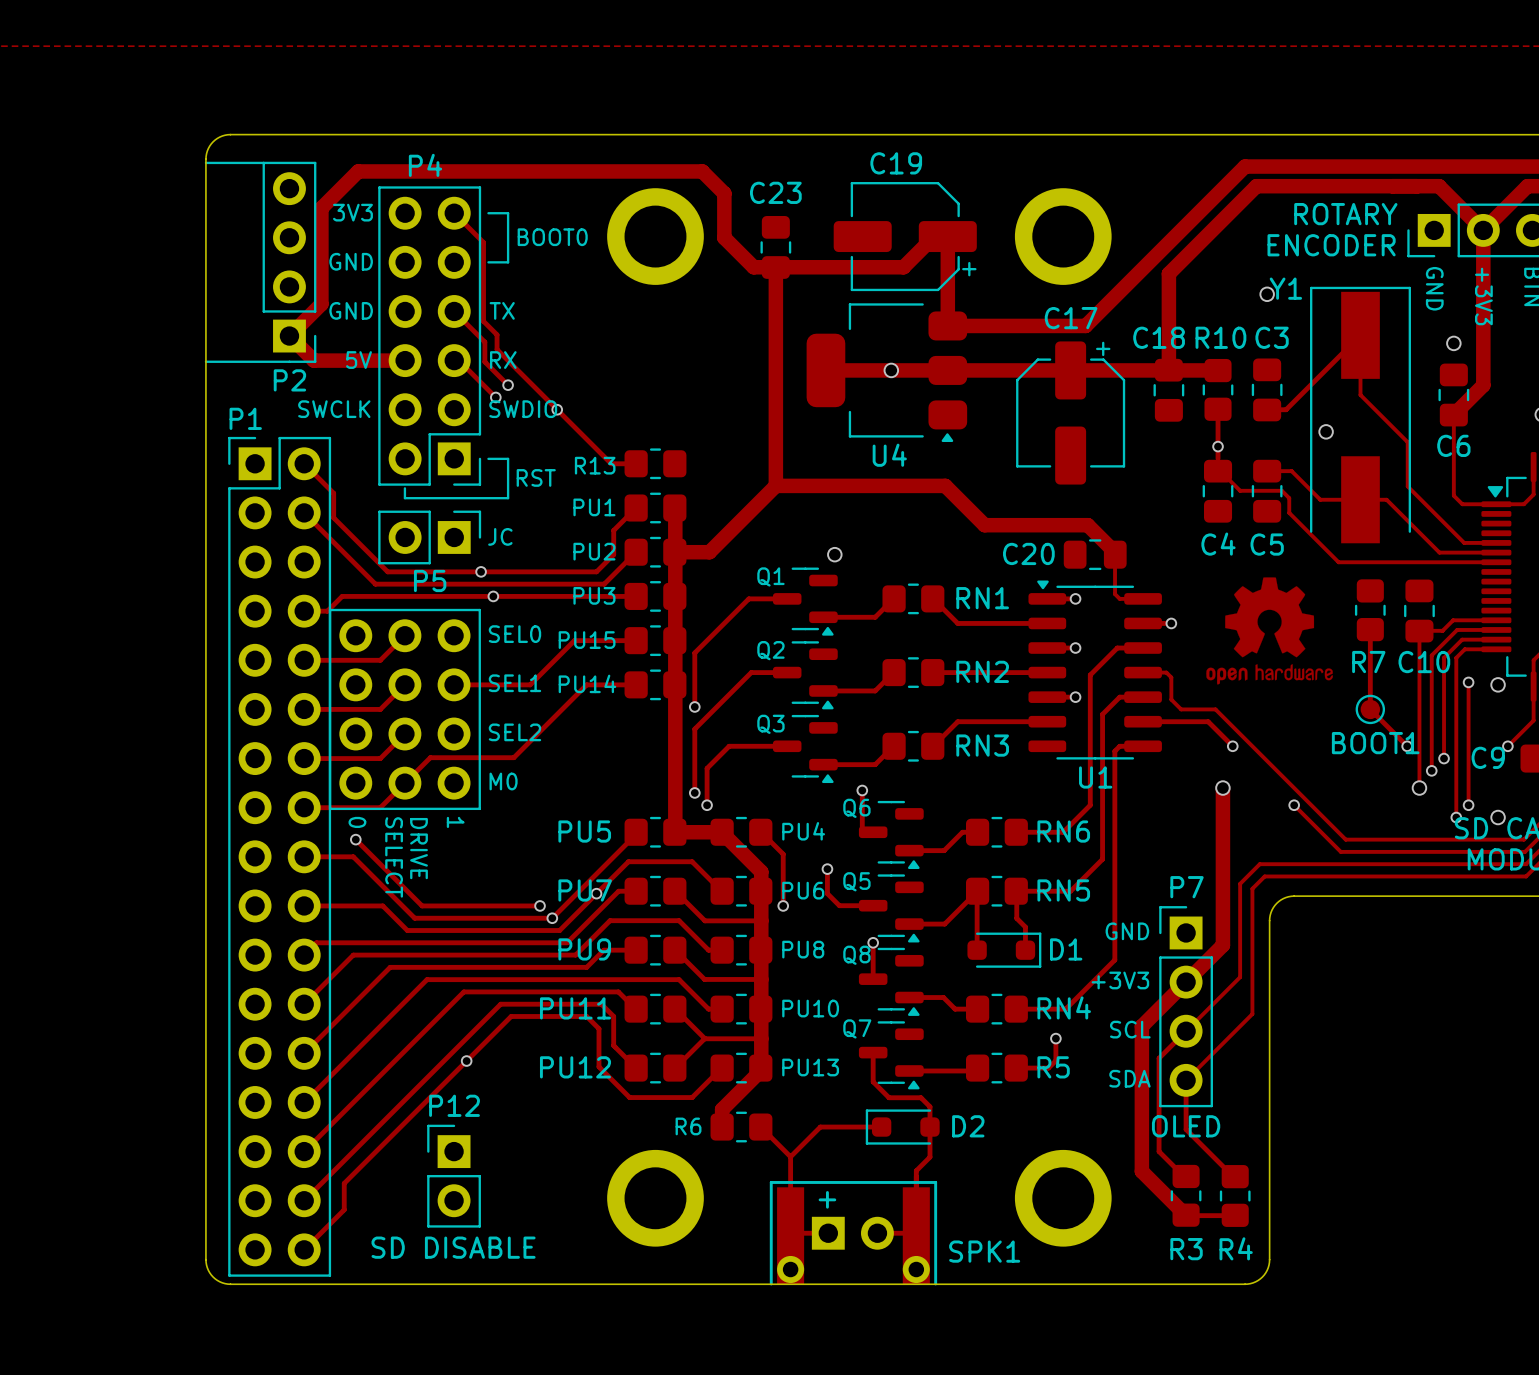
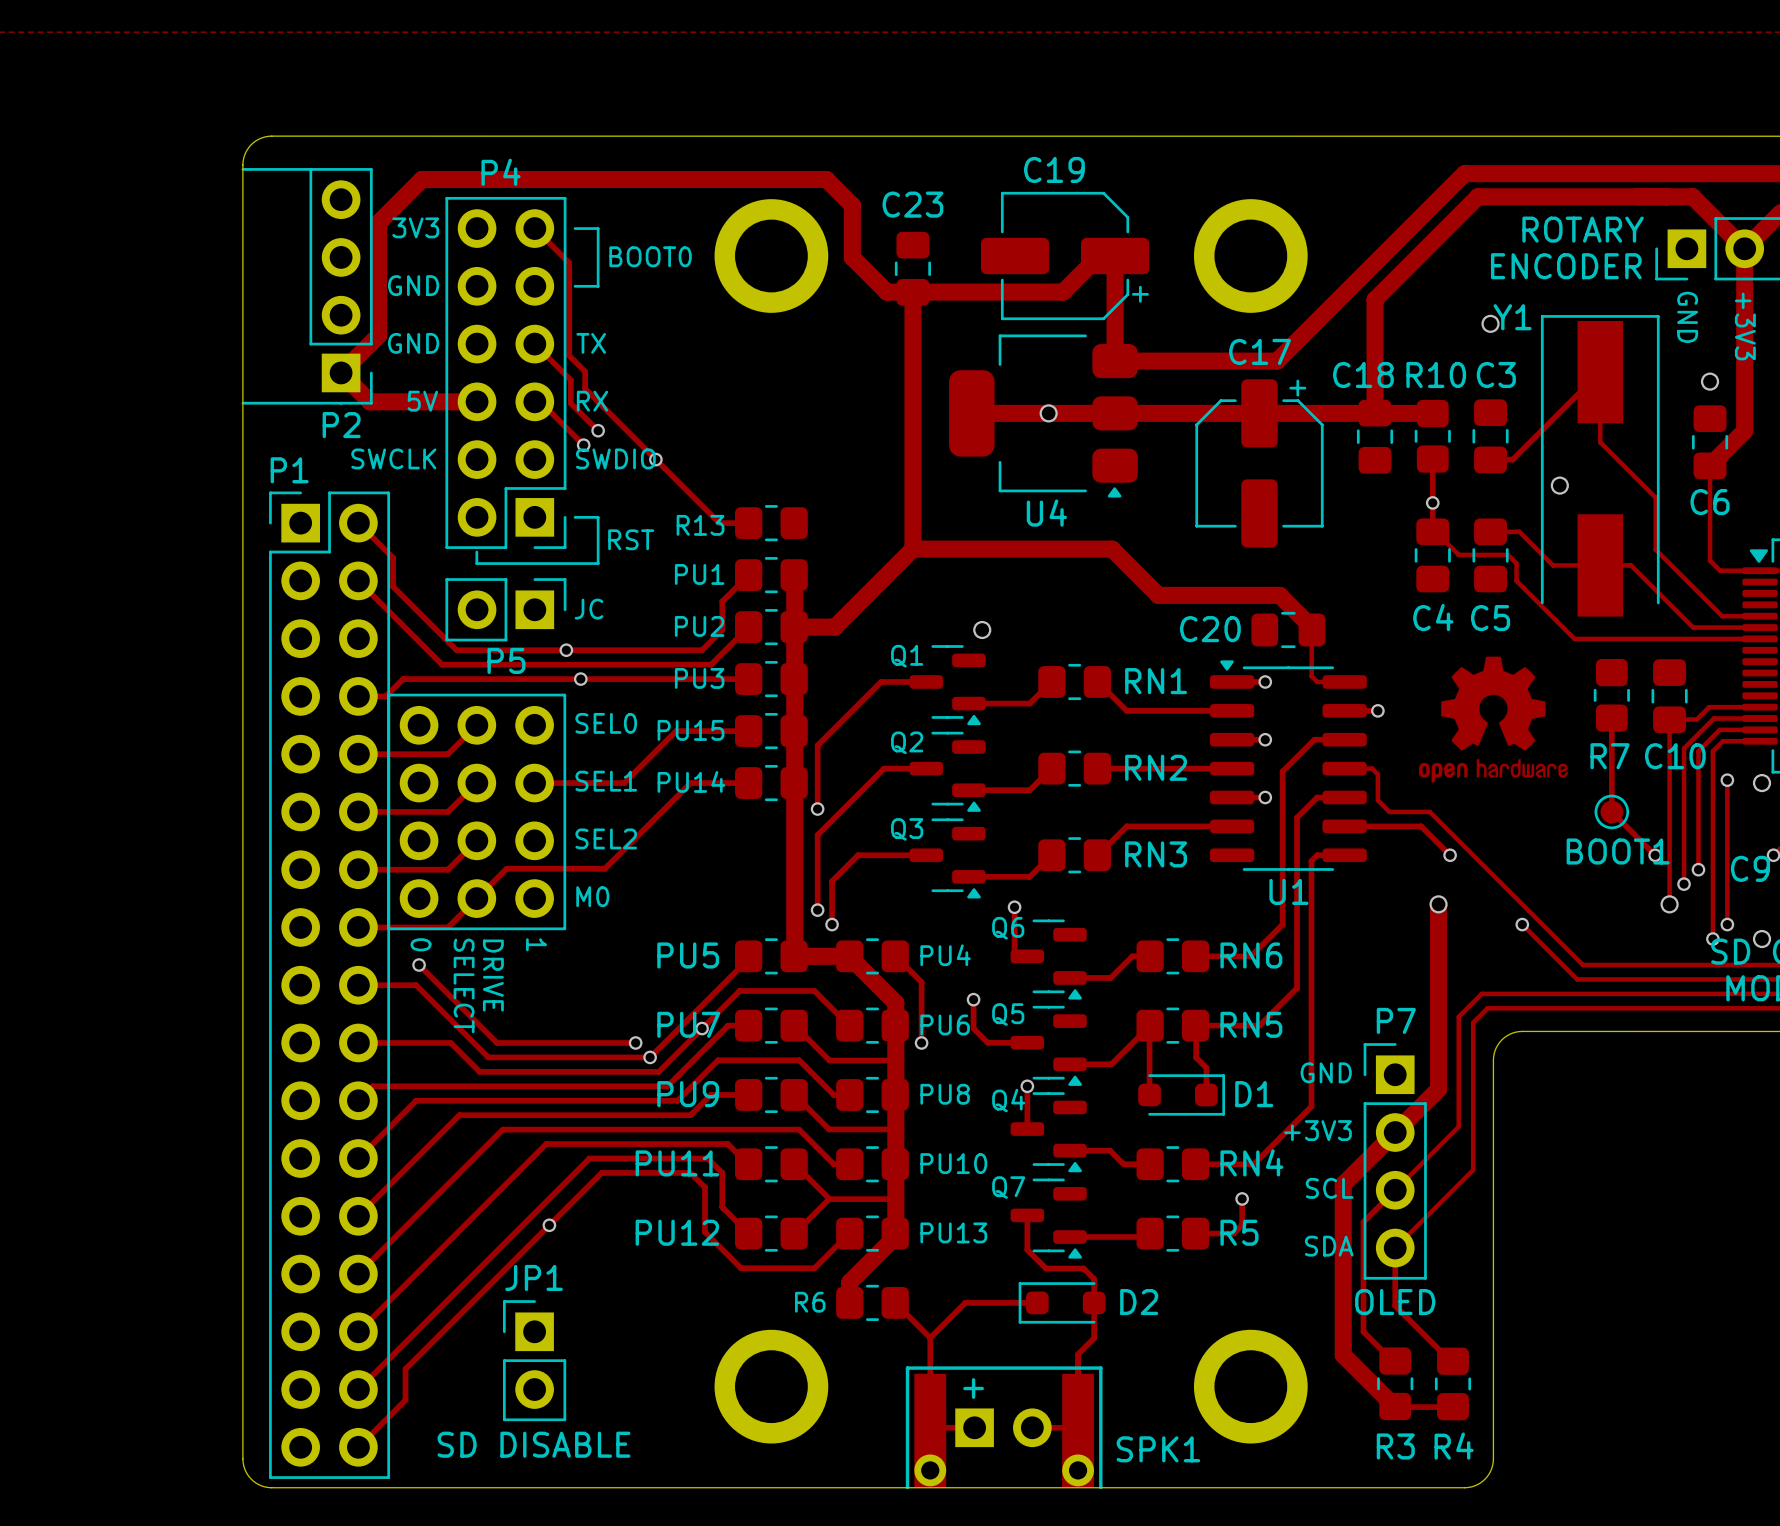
Q8 name: Q8 (856, 955) -> Q4 (1008, 1100)
P12 name: P12 (454, 1105) -> JP1 (534, 1277)

